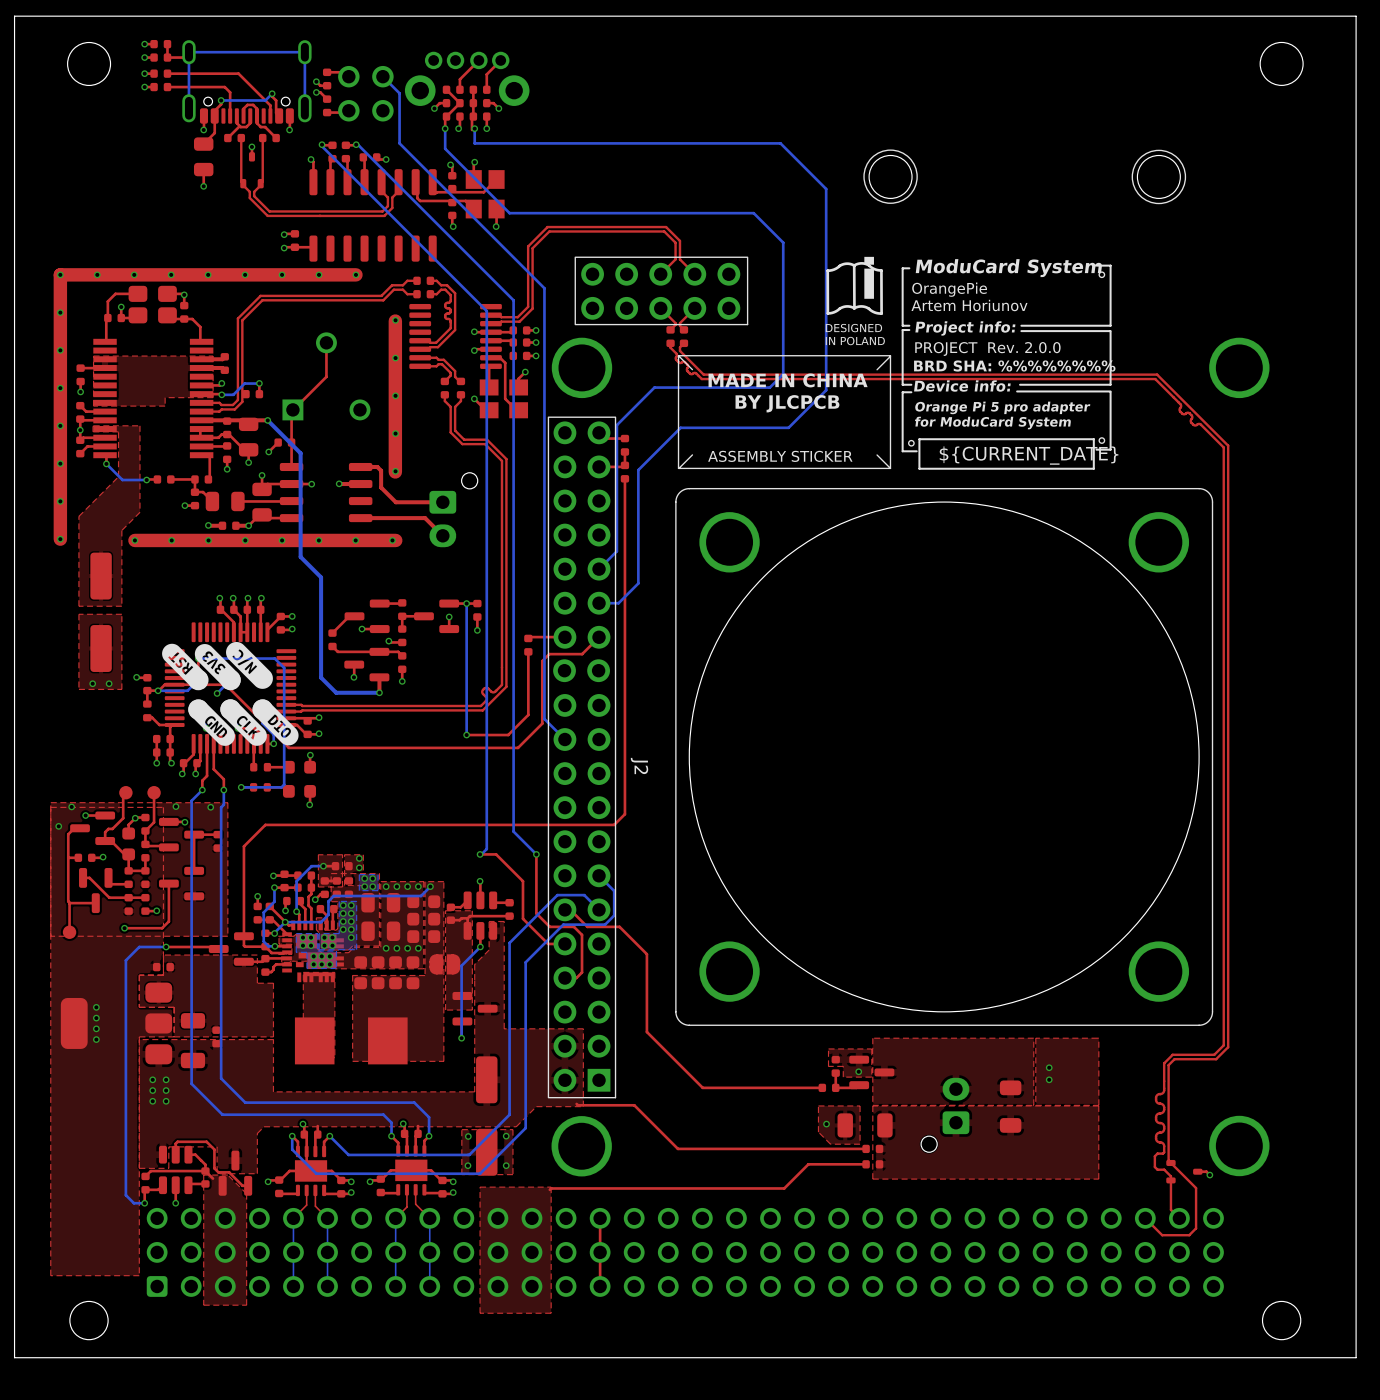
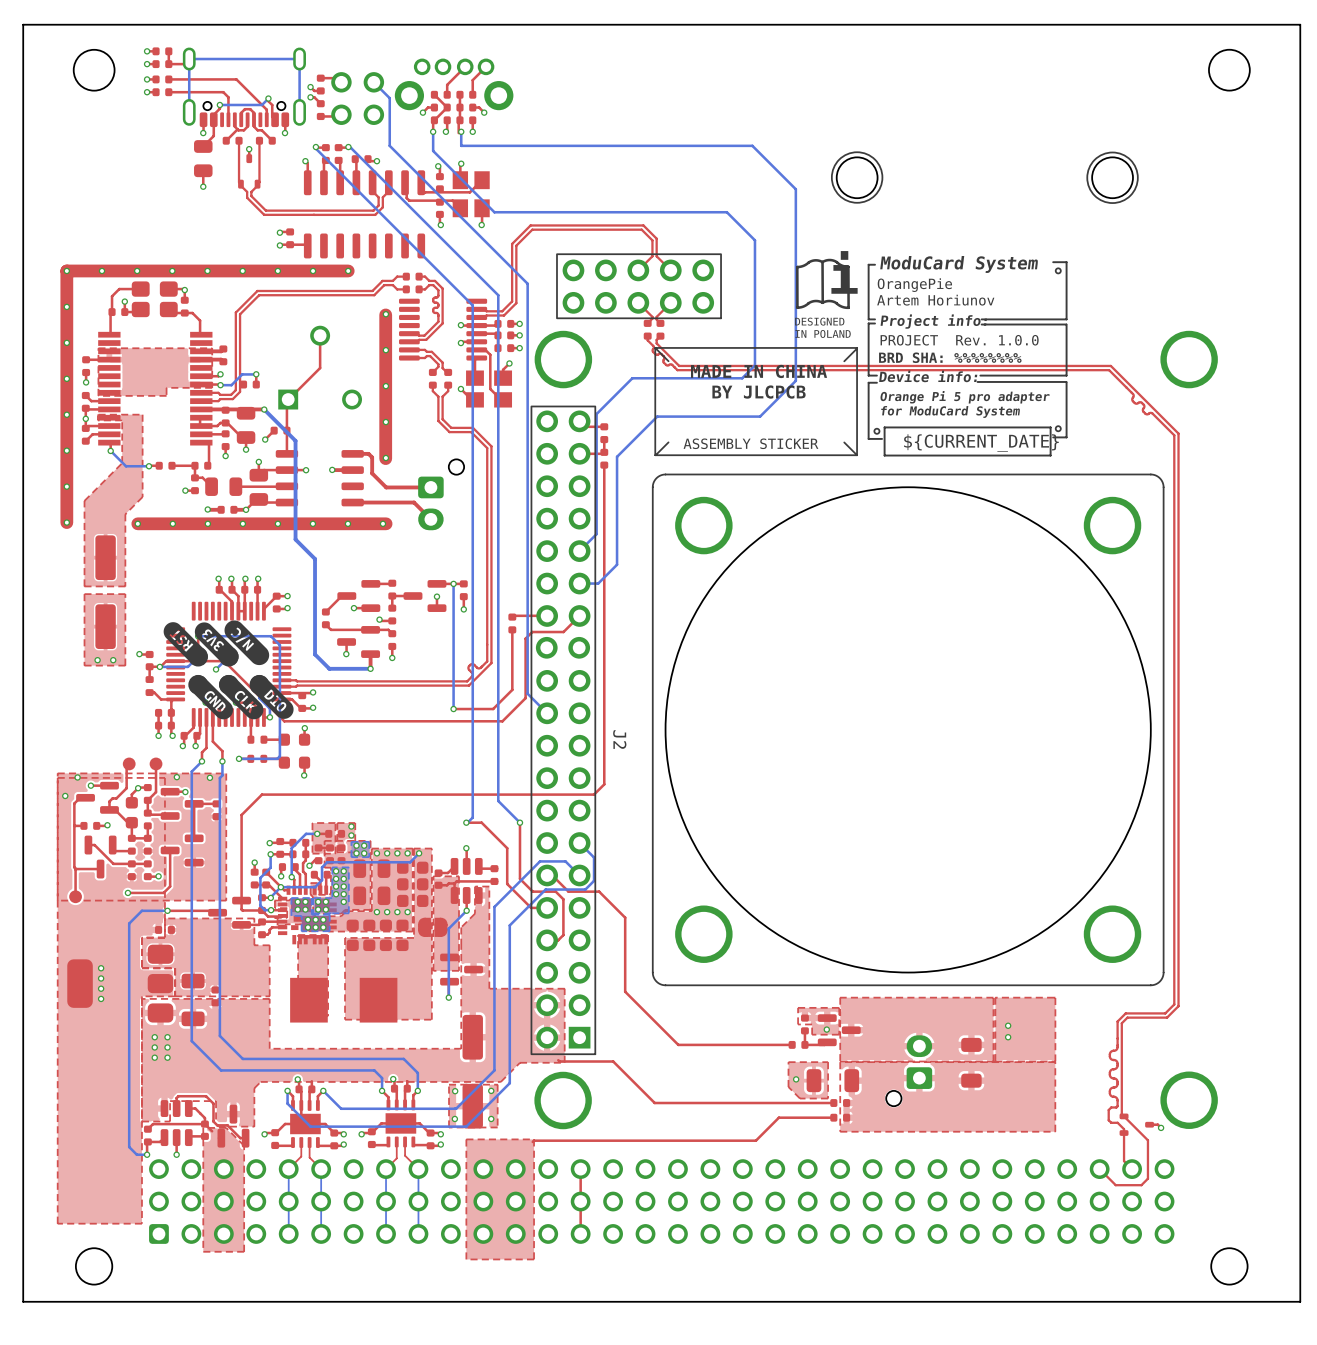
text: PROJECT Rev. 2.0.0 (987, 349) -> PROJECT Rev. 1.0.0 (959, 340)

